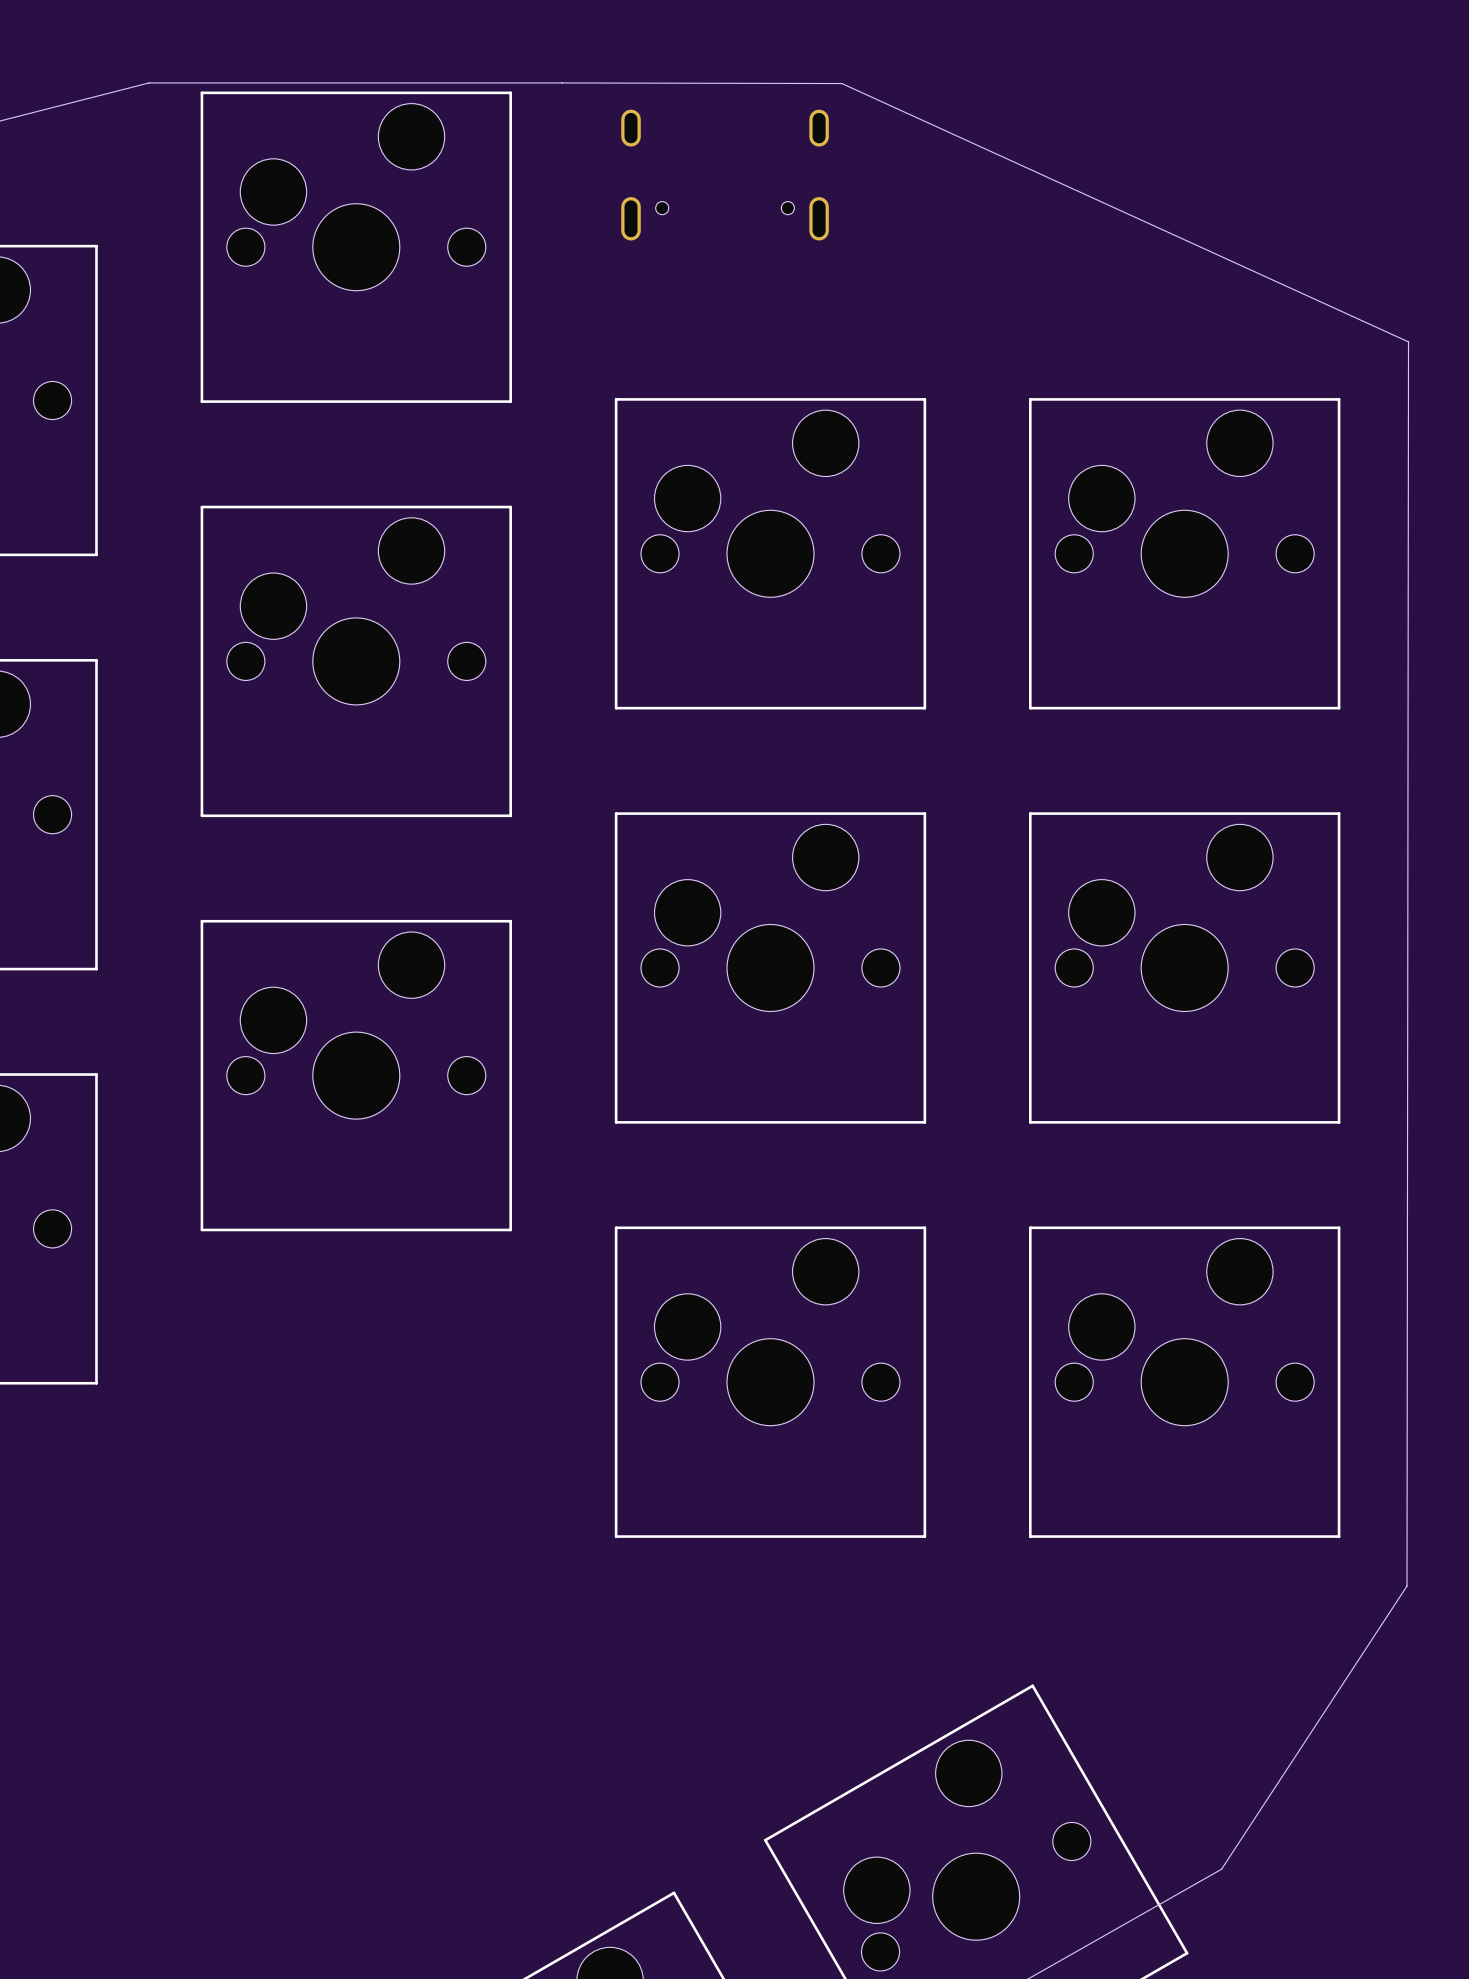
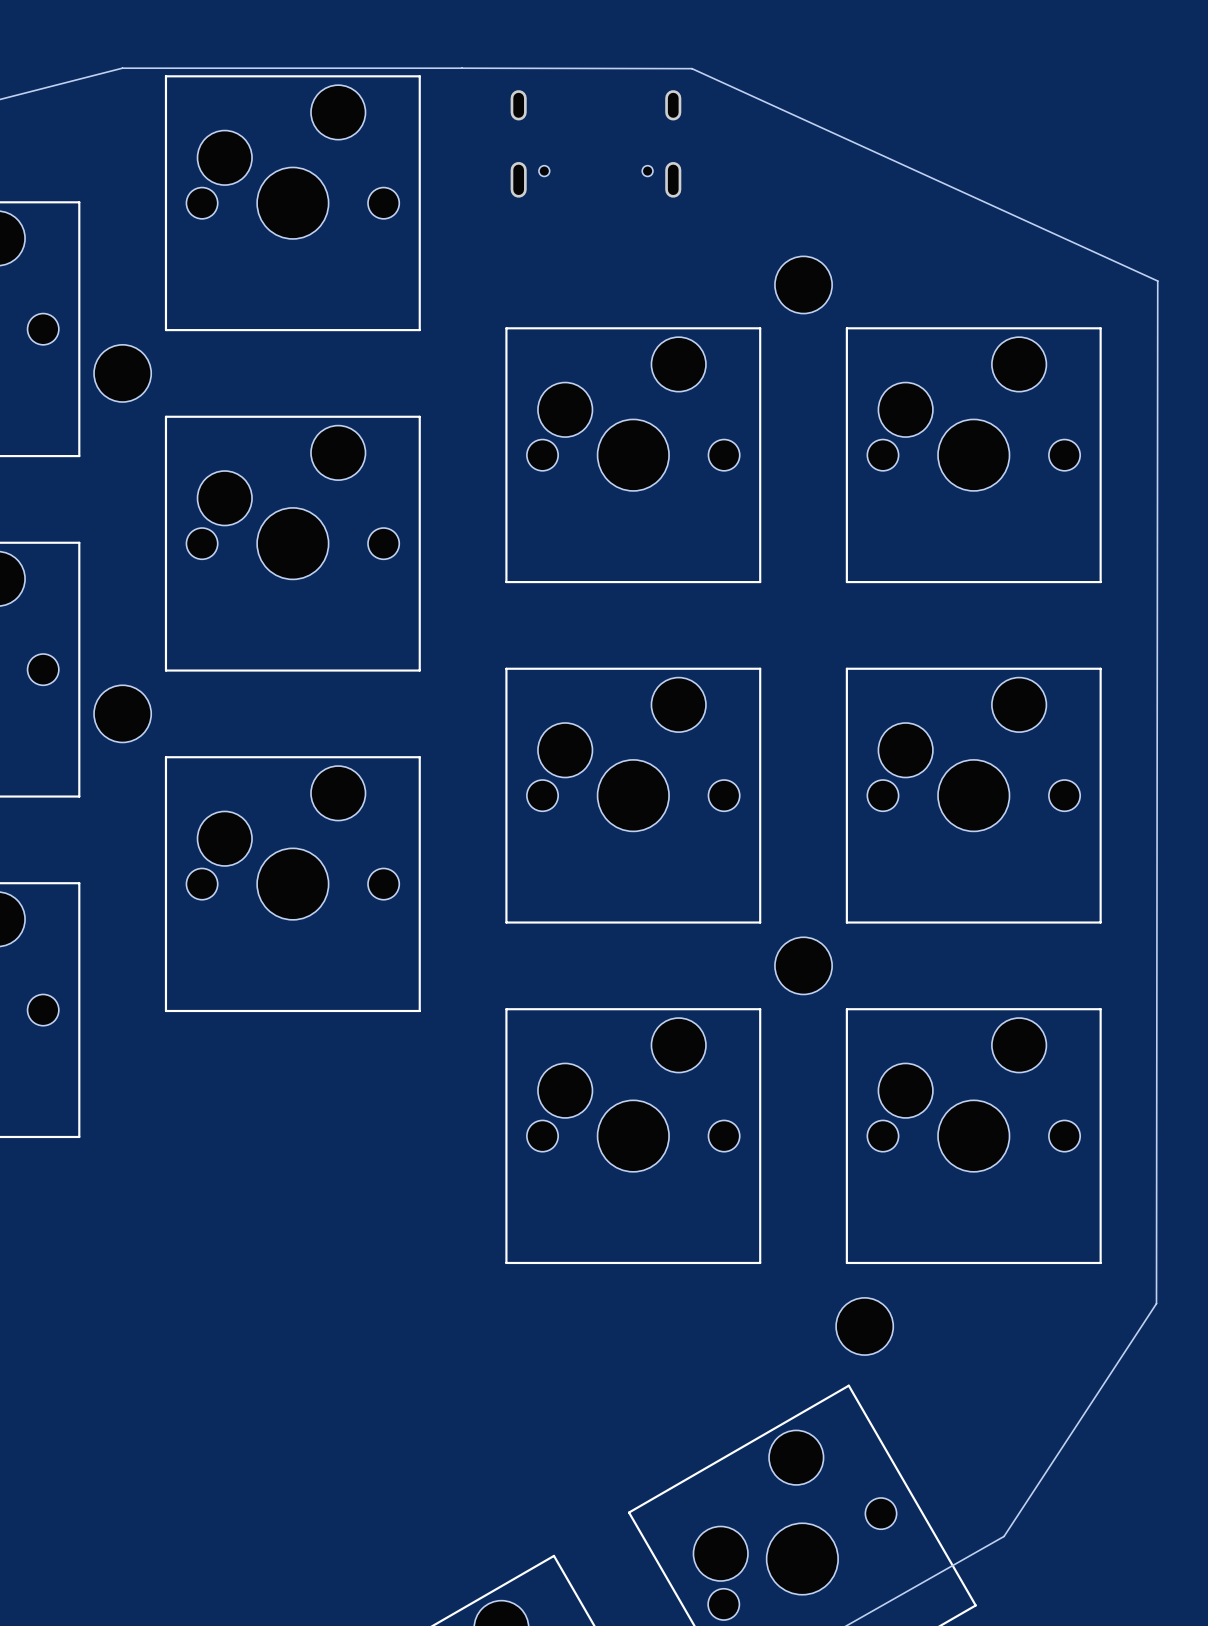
part: none -> (803, 284)
part: none -> (122, 373)
part: none -> (122, 713)
part: none -> (803, 965)
part: none -> (864, 1326)

